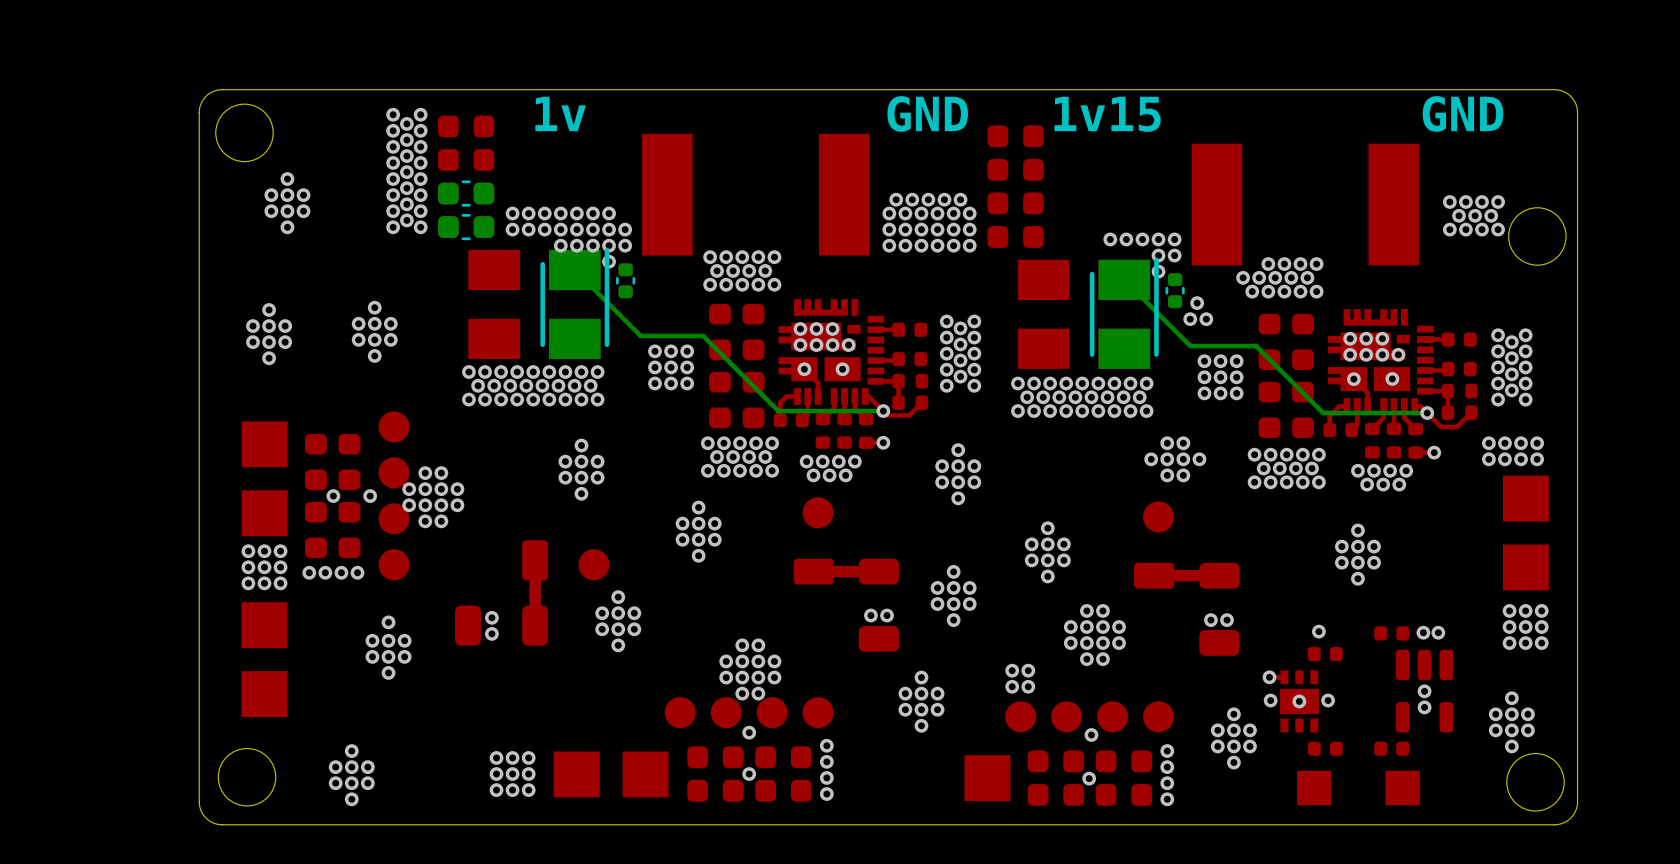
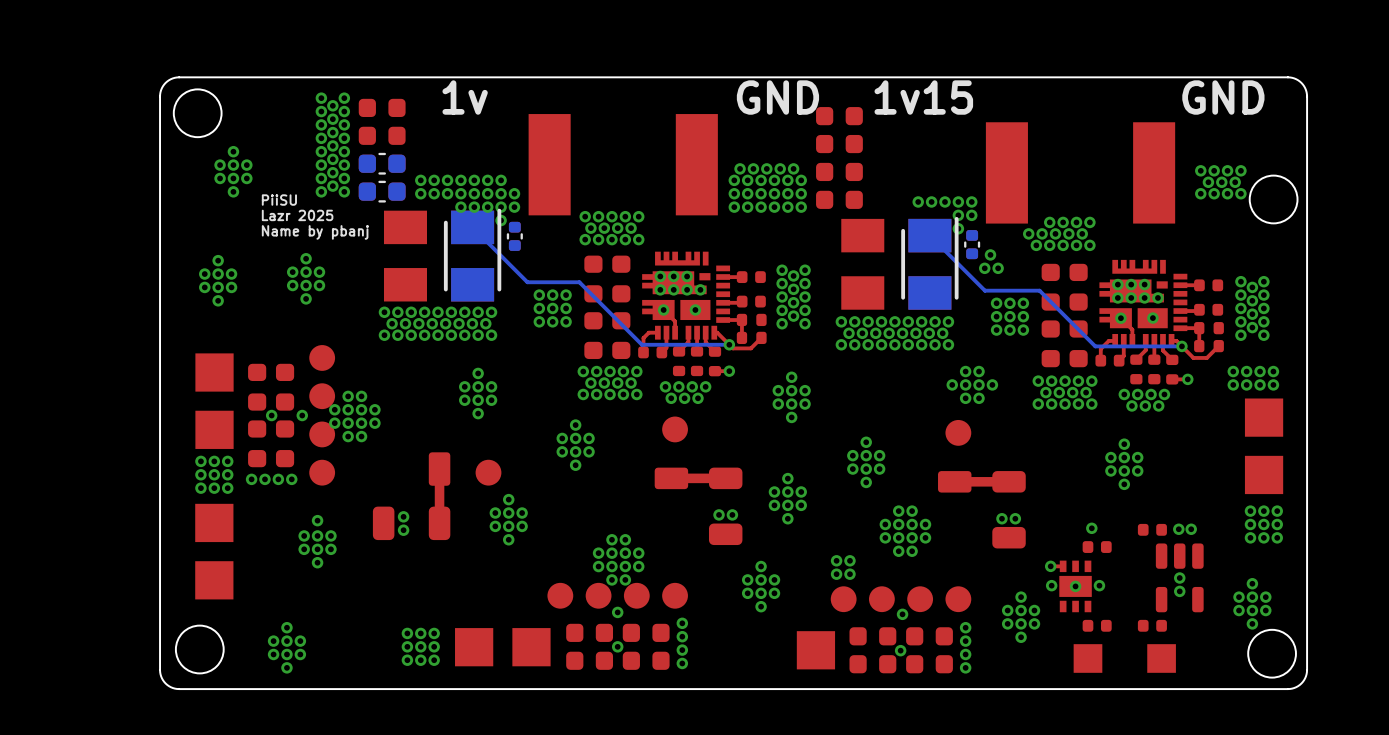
text: none -> PiiSU (279, 200)
text: none -> Lazr 2025 (297, 215)
text: none -> Name by pbanj (315, 232)

